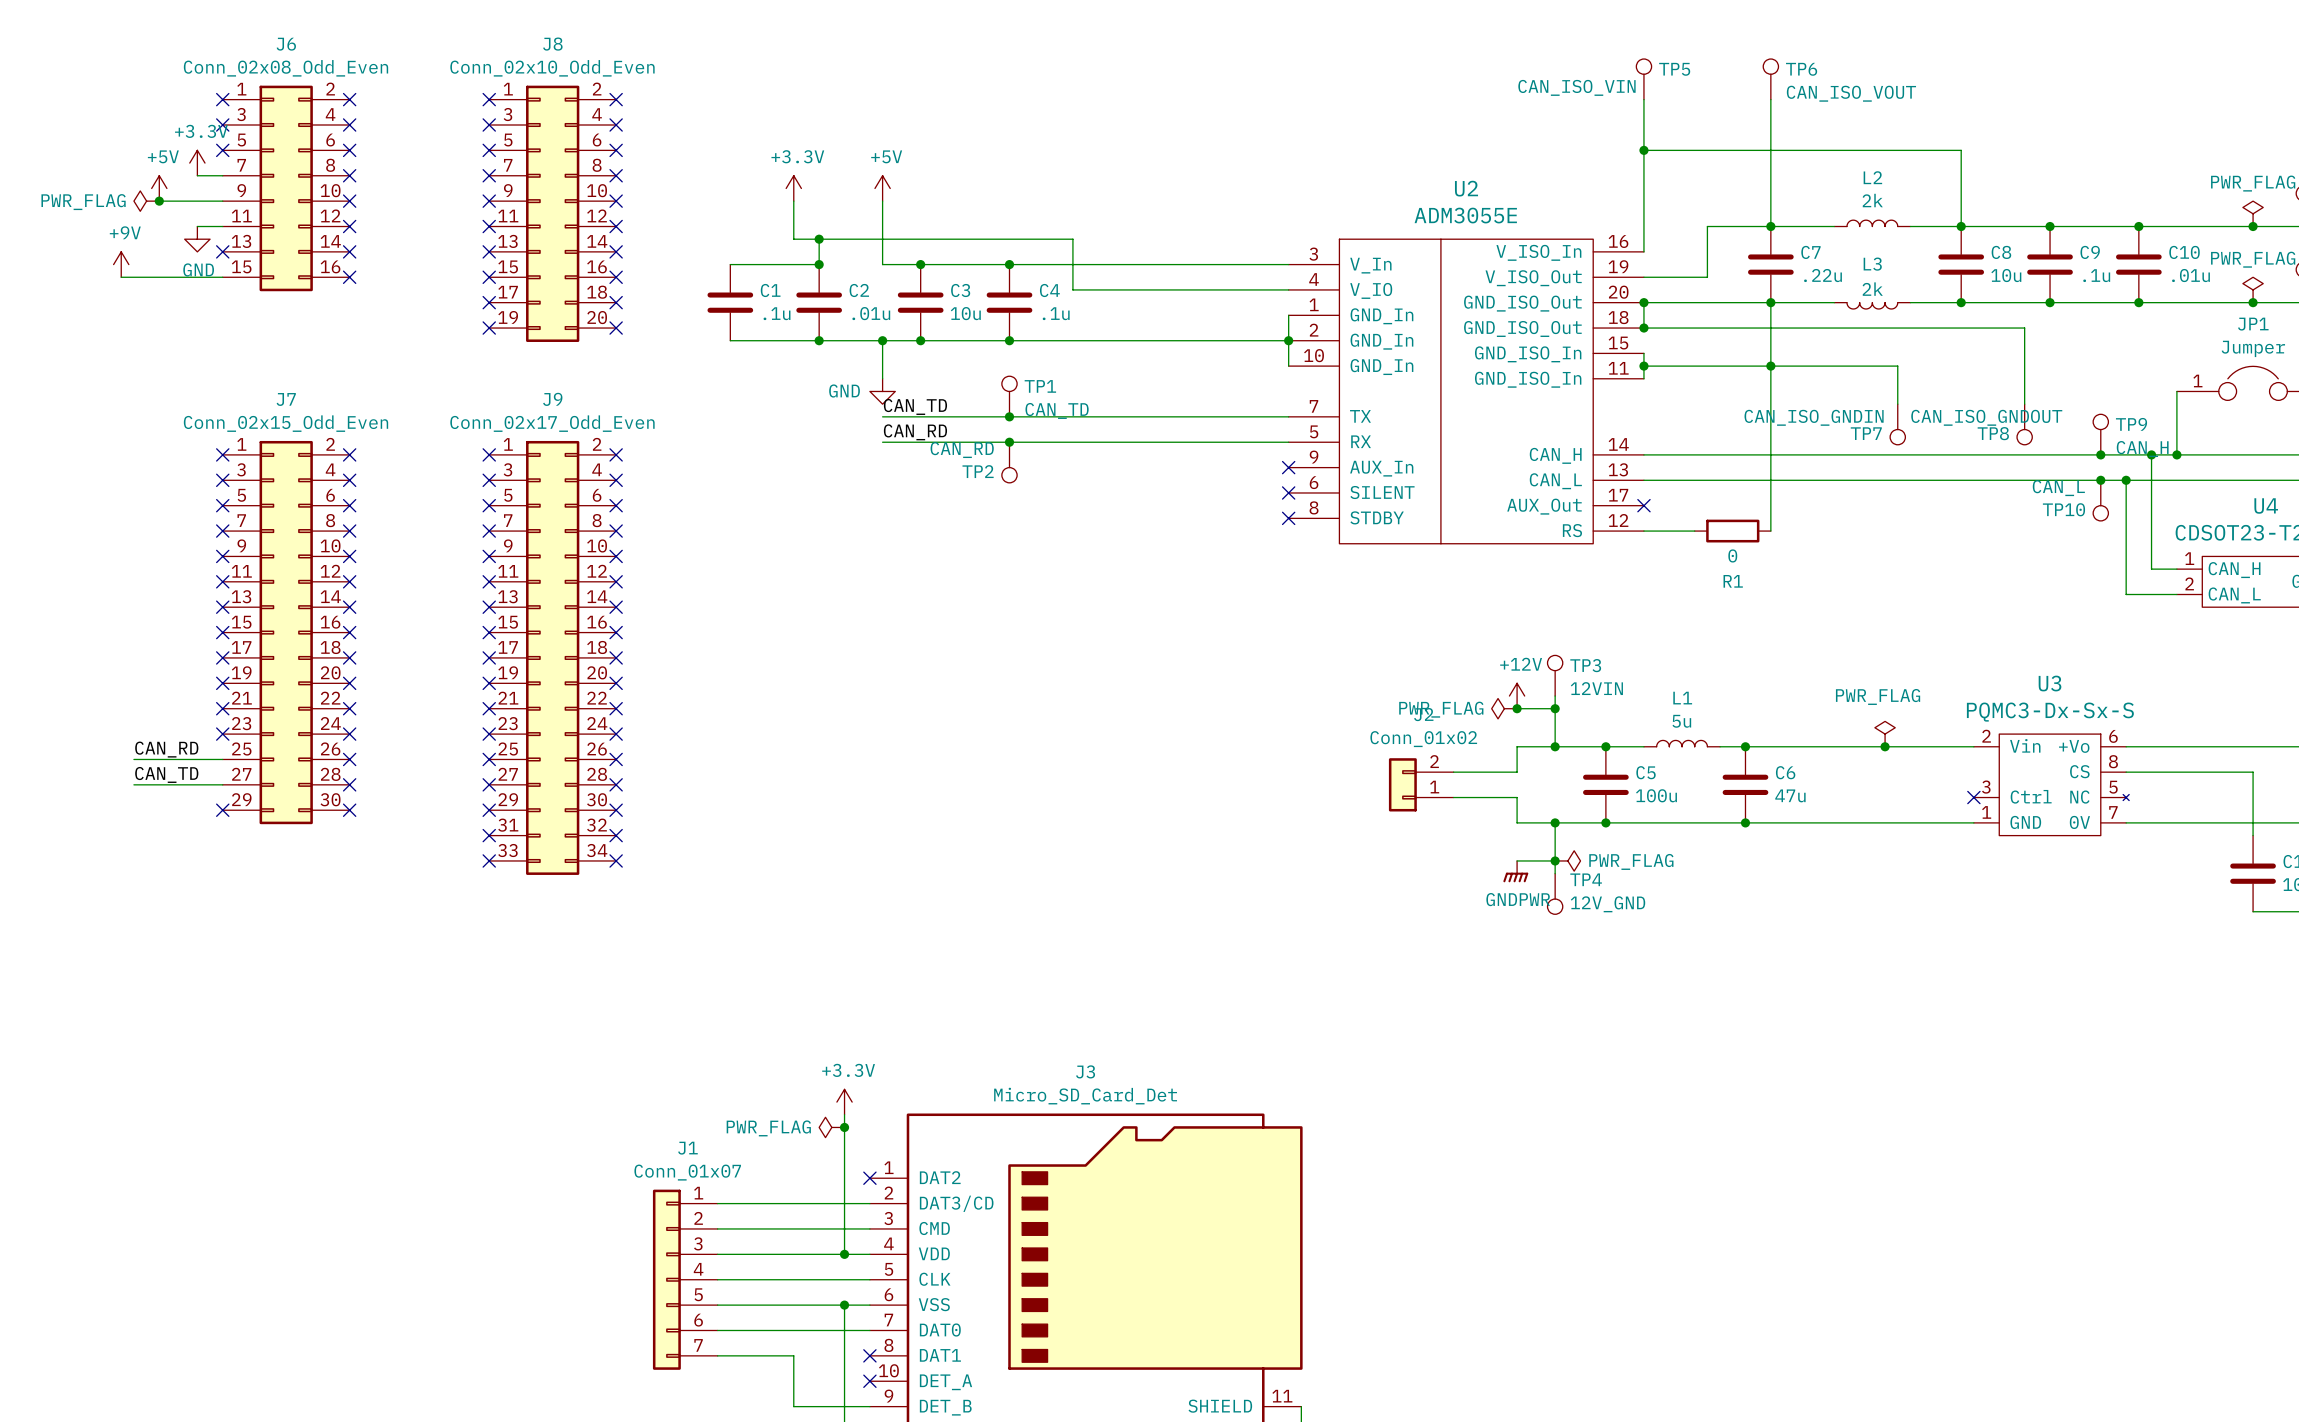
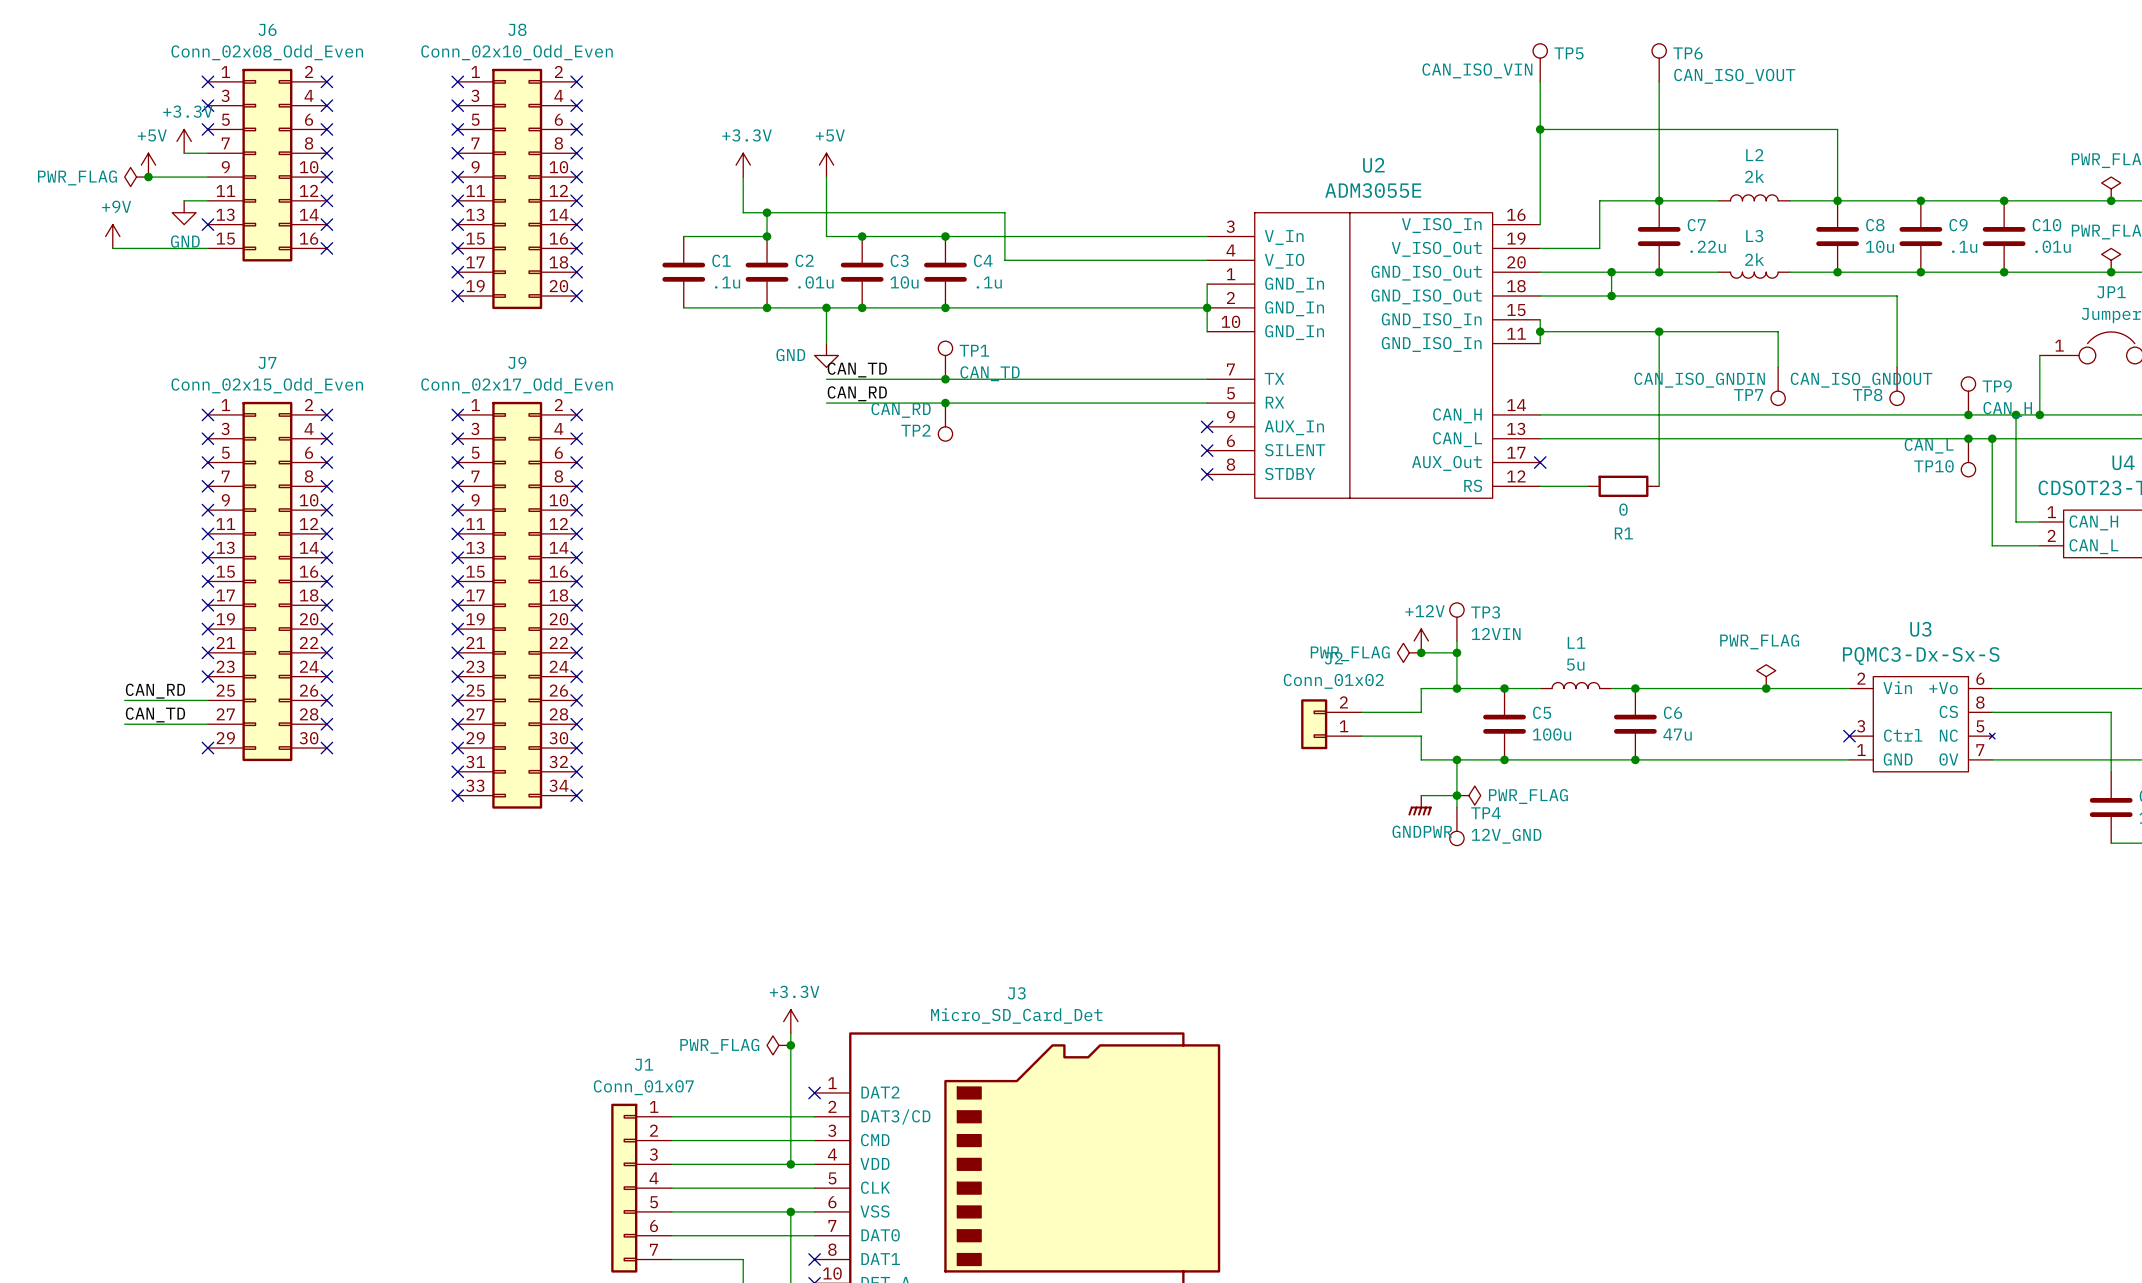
wire: (1643, 302) (1643, 328) -> (1611, 272) (1611, 296)
junction: (1643, 302) -> none
junction: none -> (1611, 272)
wire: (1770, 302) (1770, 366) -> none
junction: (1643, 328) -> none
junction: none -> (1611, 296)

